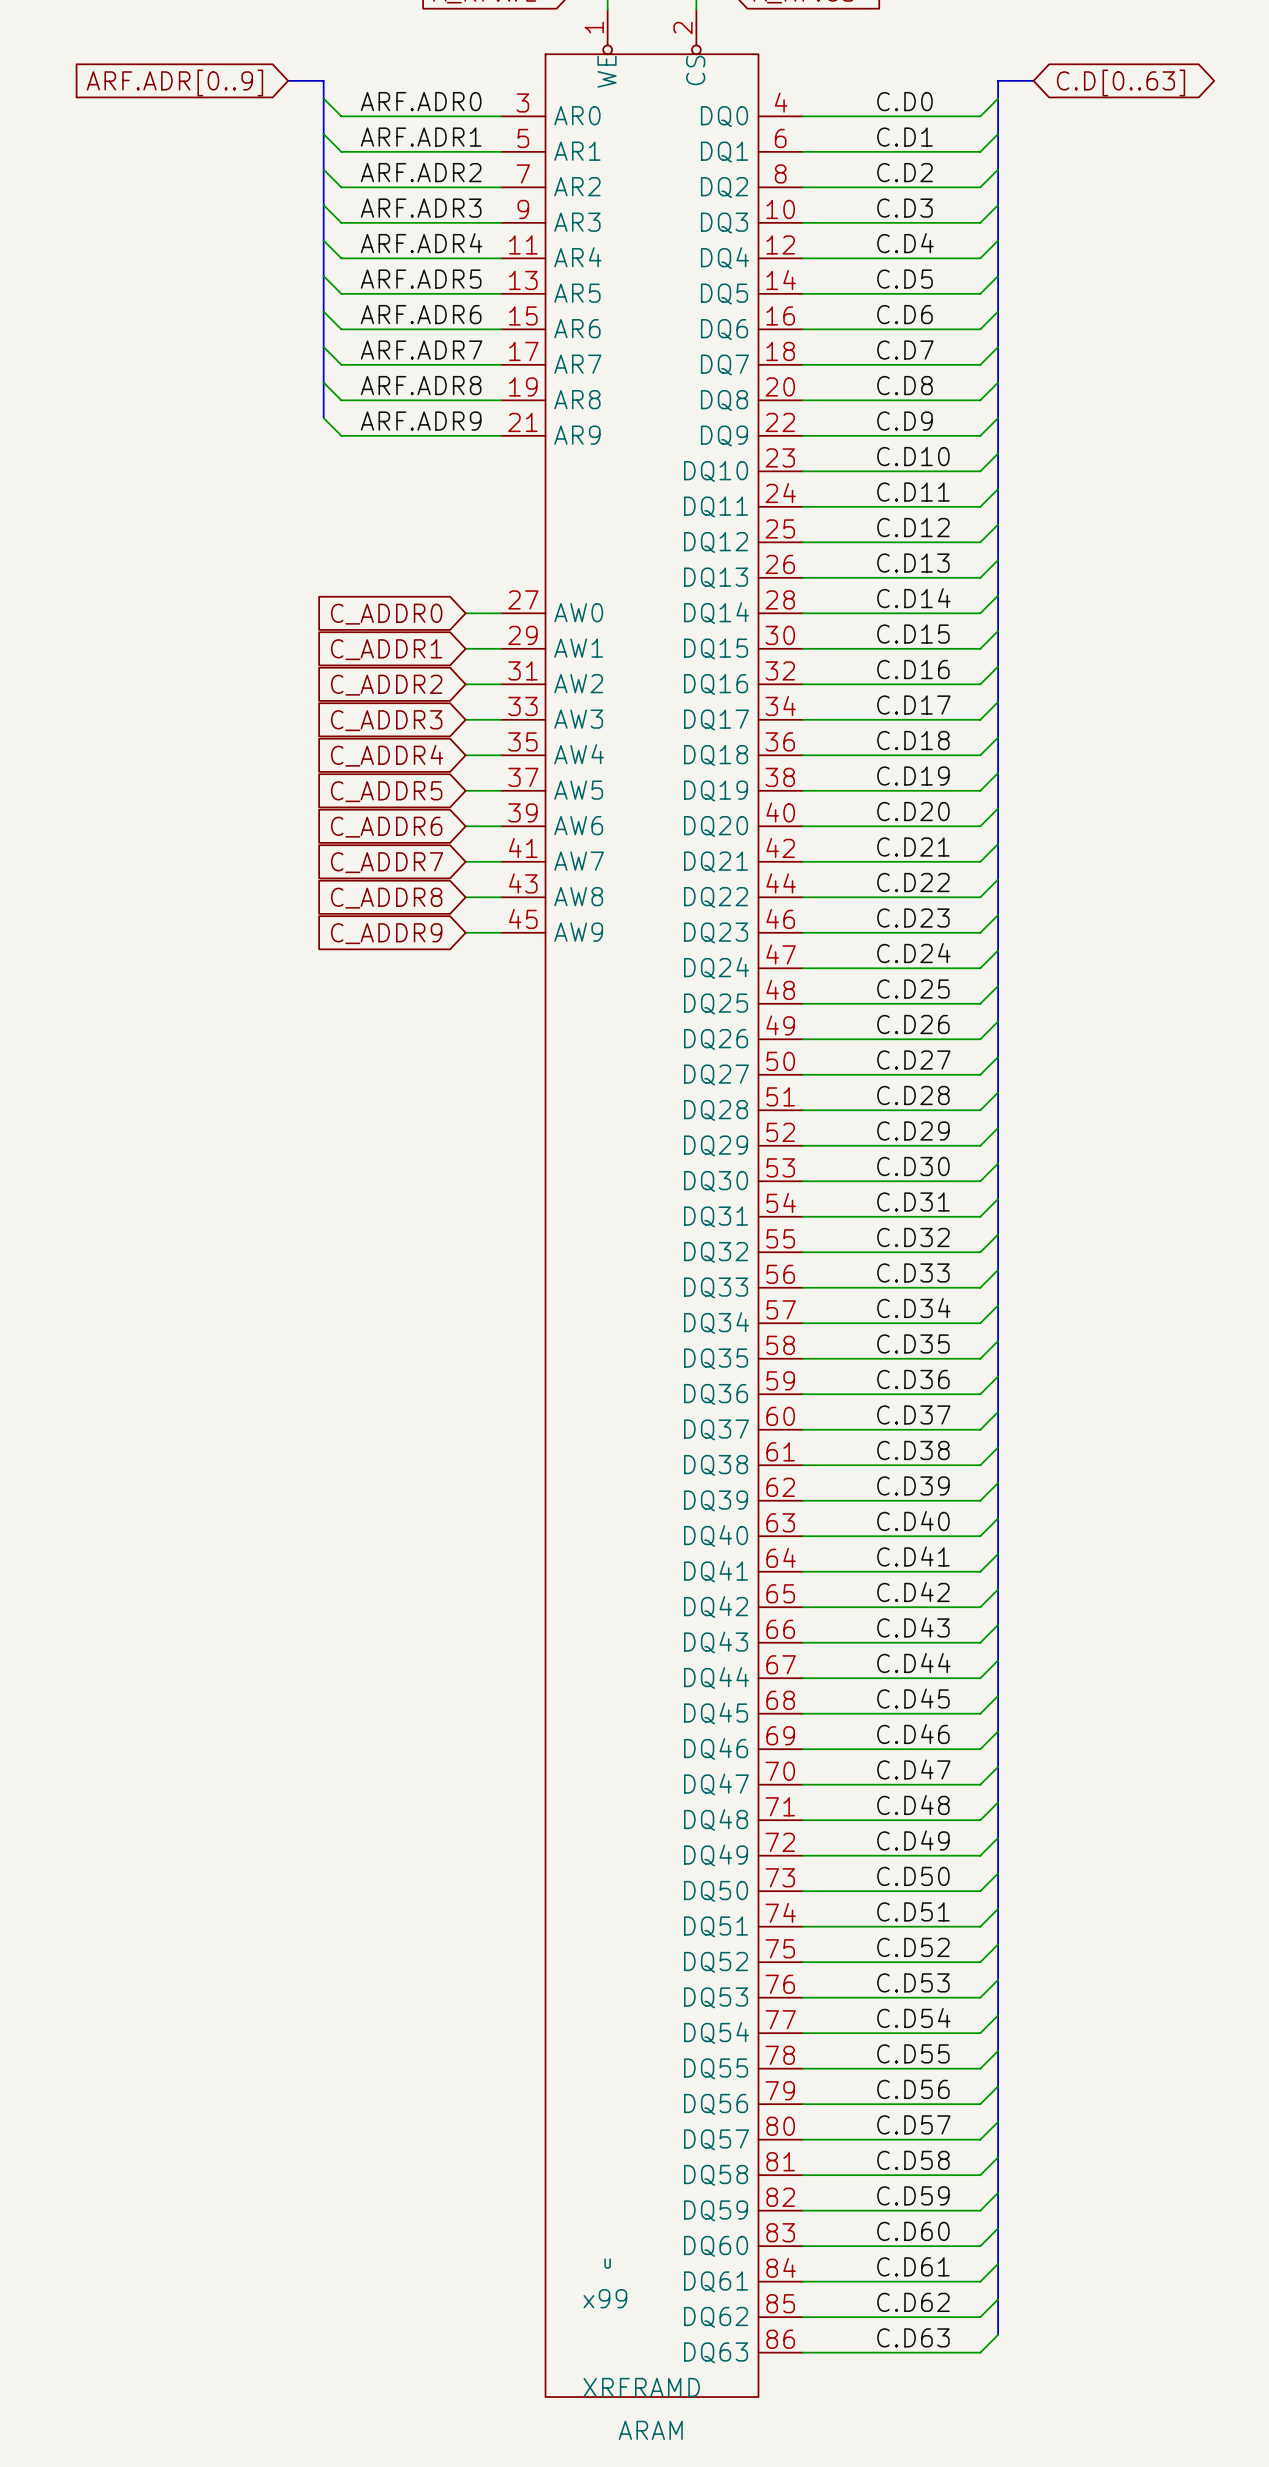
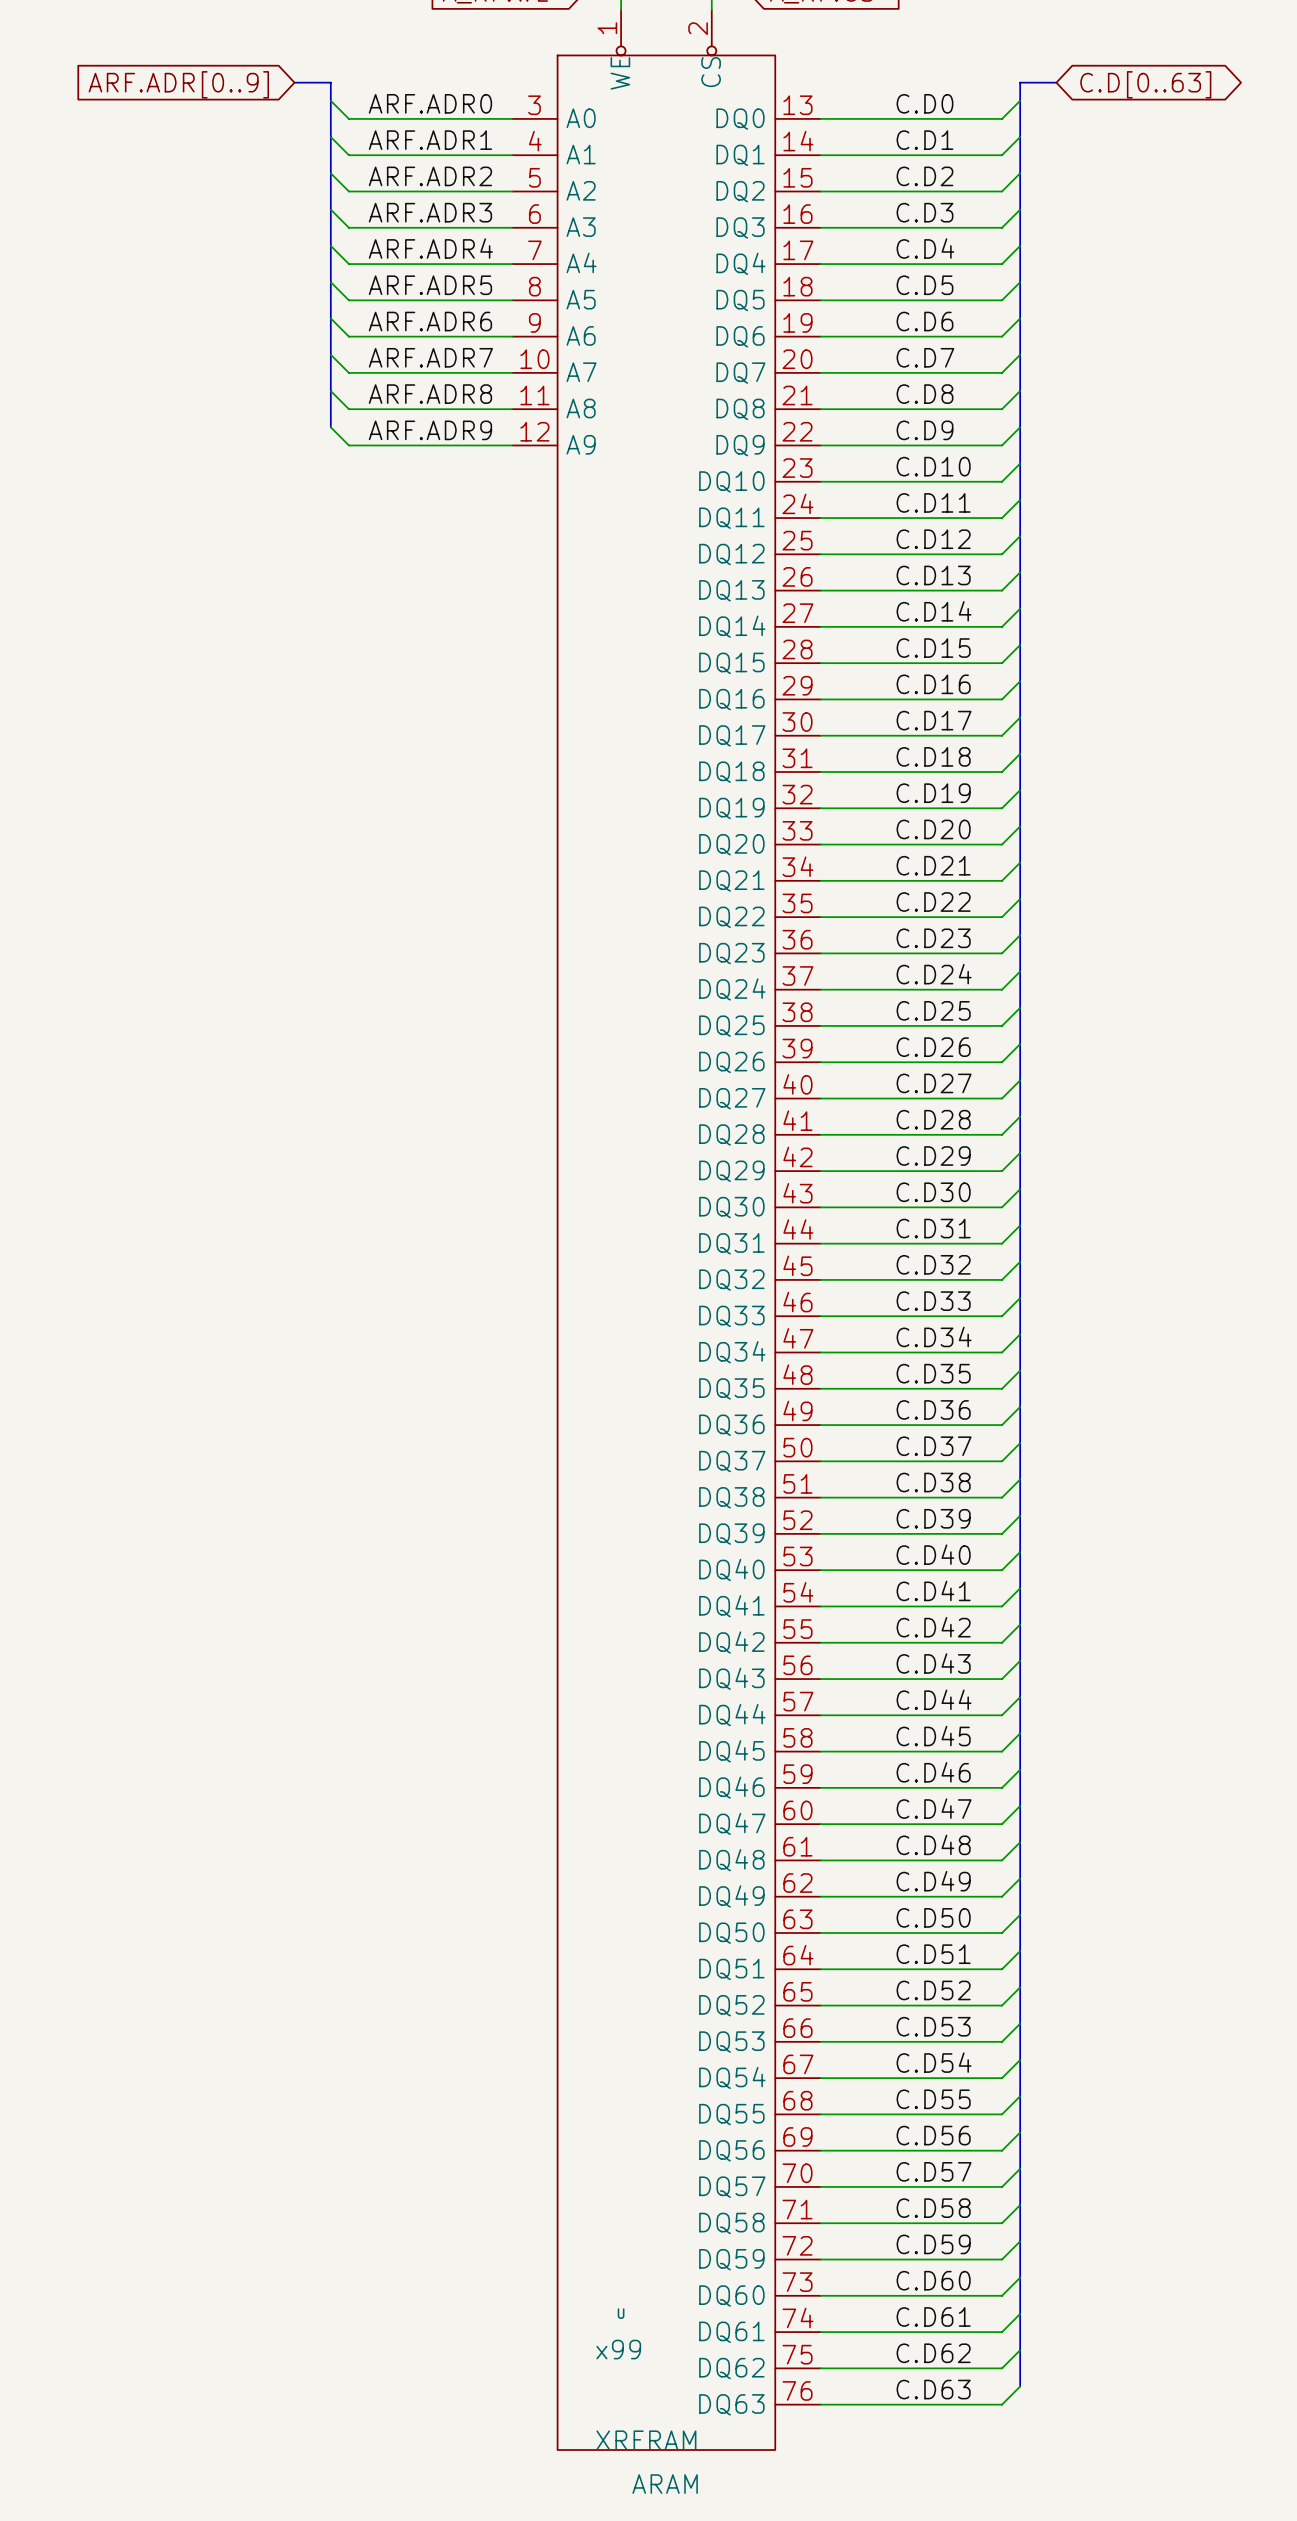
U symbol: [501, 9, 803, 2398] -> [512, 10, 821, 2451]
wire: (465, 613) (501, 613) -> none
global label: C_ADDR0 (386, 614) -> none
wire: (465, 648) (501, 648) -> none
global label: C_ADDR1 (386, 649) -> none
wire: (465, 684) (501, 684) -> none
global label: C_ADDR2 (386, 685) -> none
wire: (465, 719) (501, 719) -> none
global label: C_ADDR3 (386, 720) -> none
global label: C_ADDR4 (387, 755) -> none
wire: (465, 755) (501, 755) -> none
wire: (465, 790) (501, 790) -> none
global label: C_ADDR5 (386, 791) -> none
wire: (465, 826) (501, 826) -> none
global label: C_ADDR6 (386, 827) -> none
wire: (465, 861) (501, 861) -> none
global label: C_ADDR7 (387, 862) -> none
wire: (465, 897) (501, 897) -> none
global label: C_ADDR8 (386, 898) -> none
wire: (465, 932) (501, 932) -> none
global label: C_ADDR9 (386, 933) -> none
U value: XRFRAMD (641, 2387) -> XRFRAM (646, 2440)

